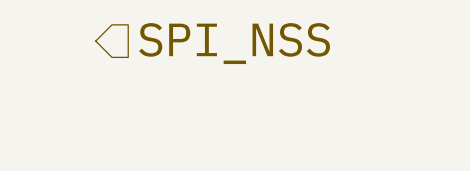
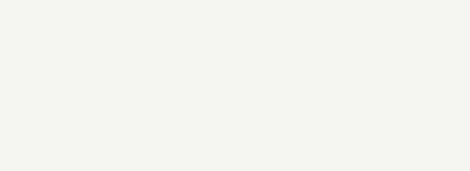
hierarchical label: SPI_NSS (234, 43) -> none

